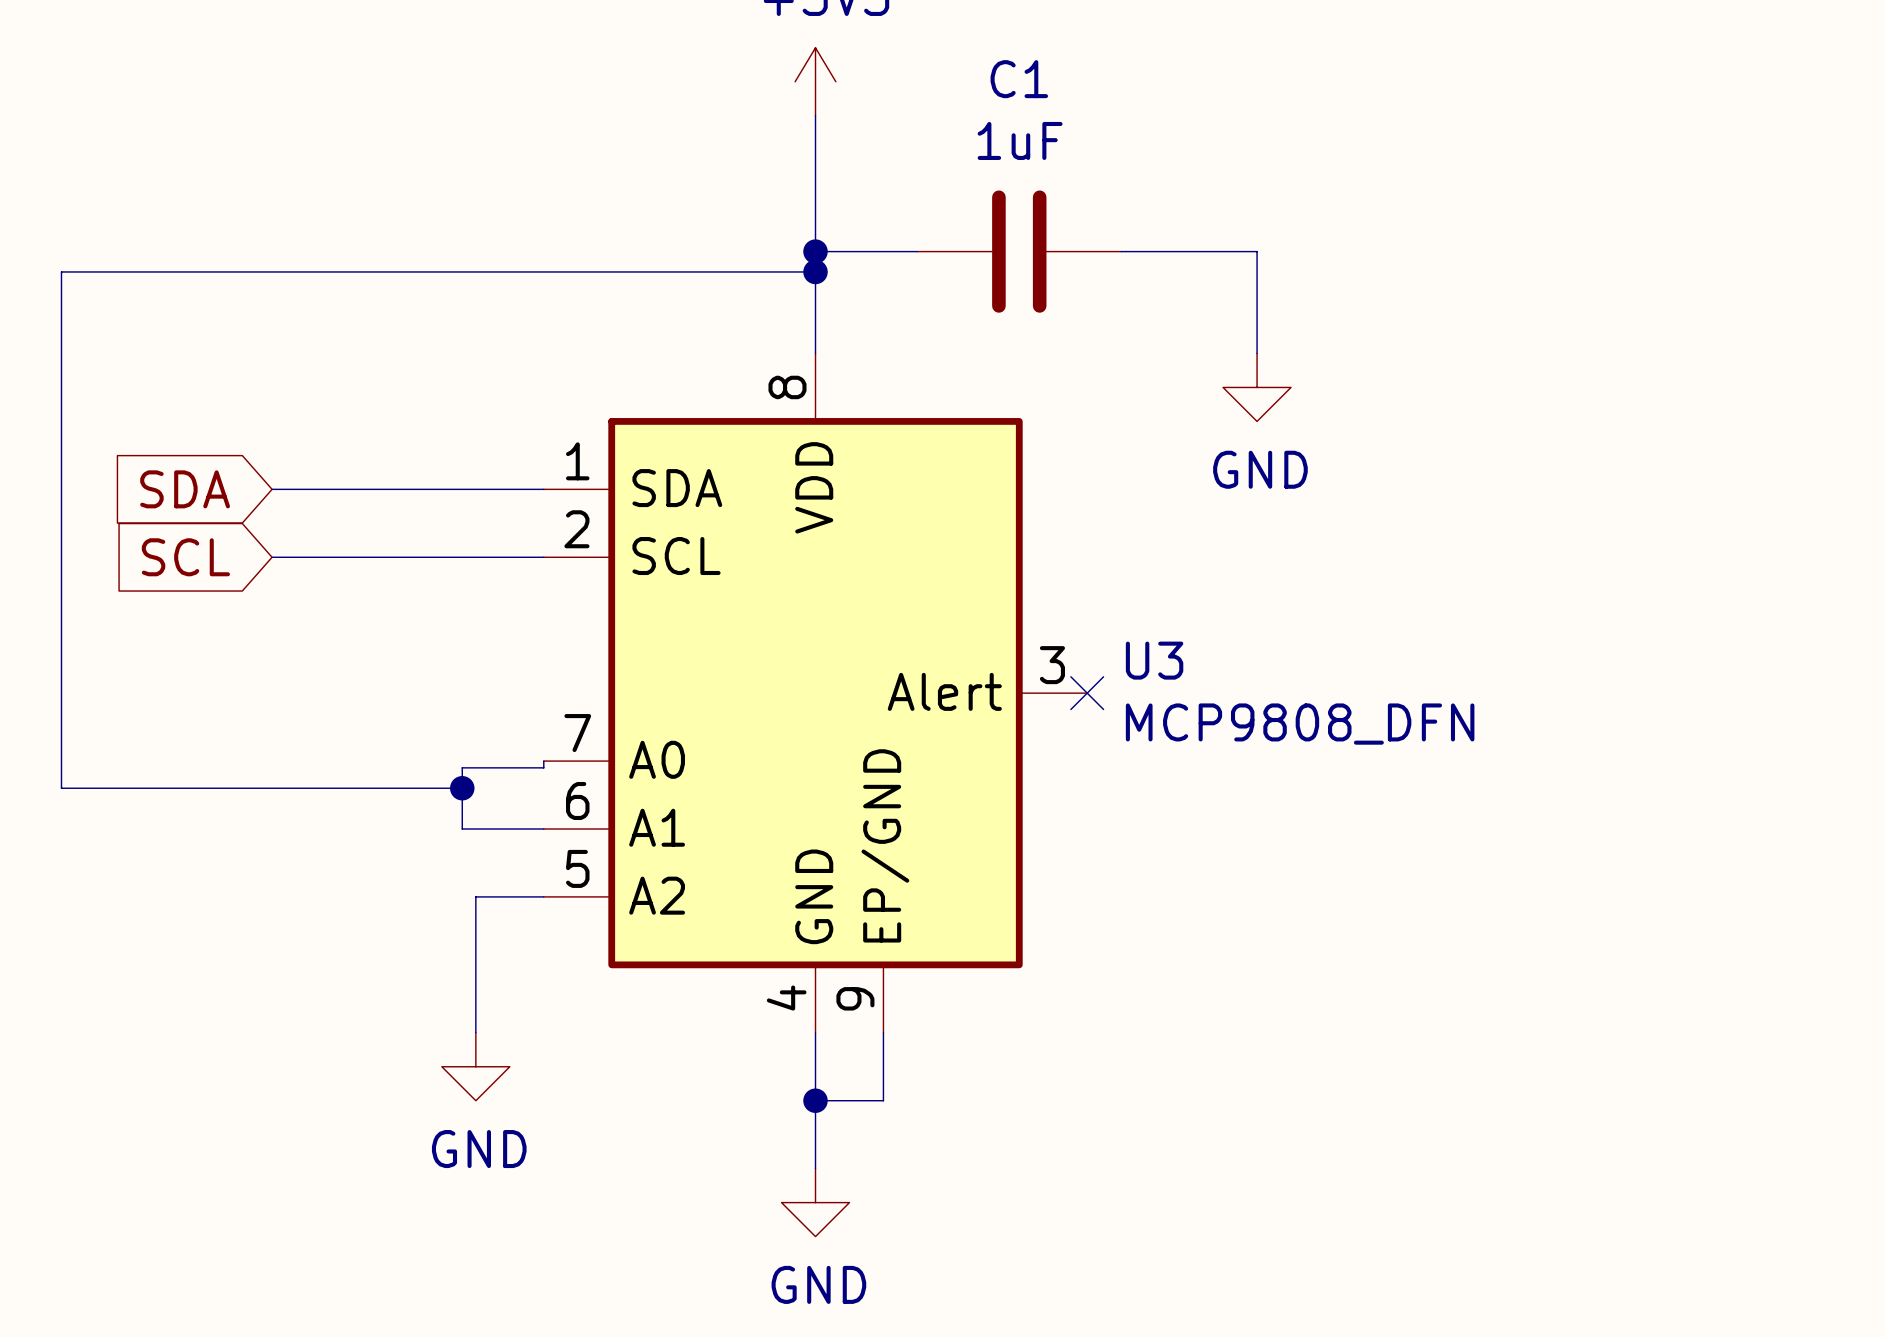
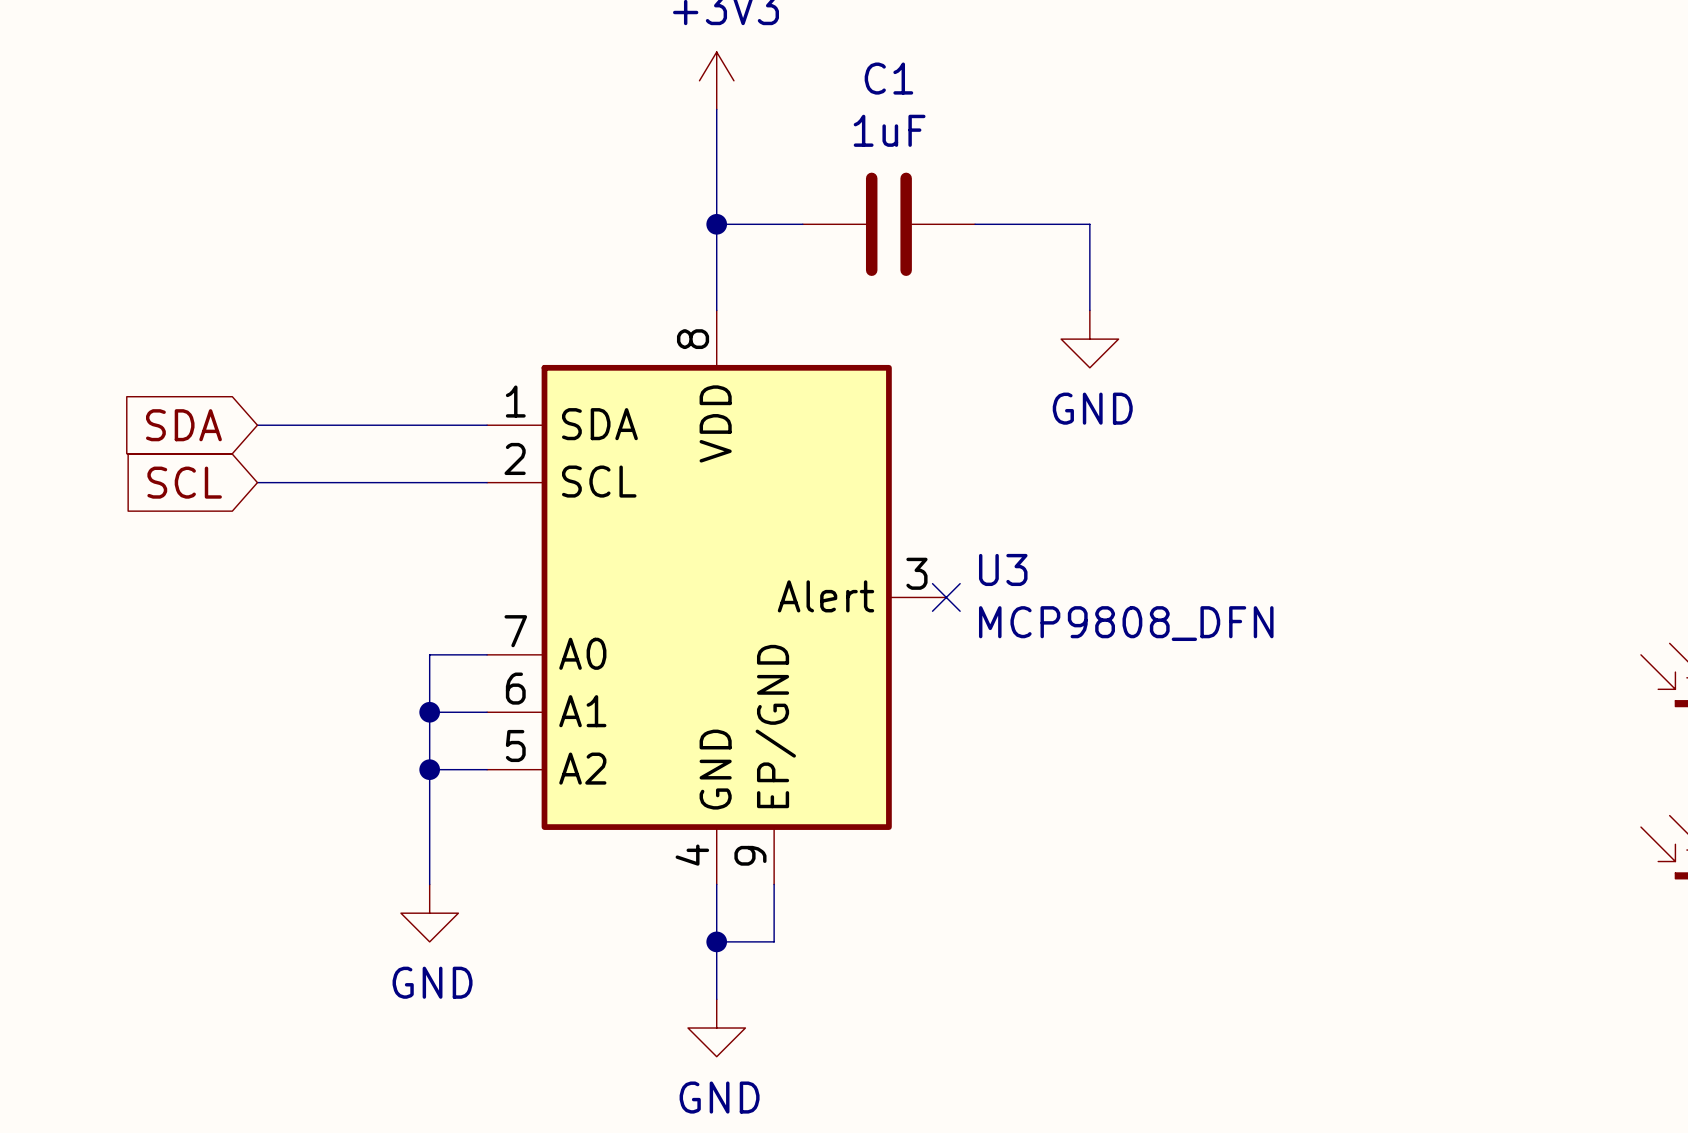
wire: (815, 271) (61, 271) (61, 788) (462, 788) -> none
junction: (815, 271) -> none
wire: (543, 761) (543, 767) (462, 767) (462, 829) (475, 829) -> (487, 654) (429, 654) (429, 769)
junction position: (462, 788) -> (429, 712)
junction: none -> (429, 769)

